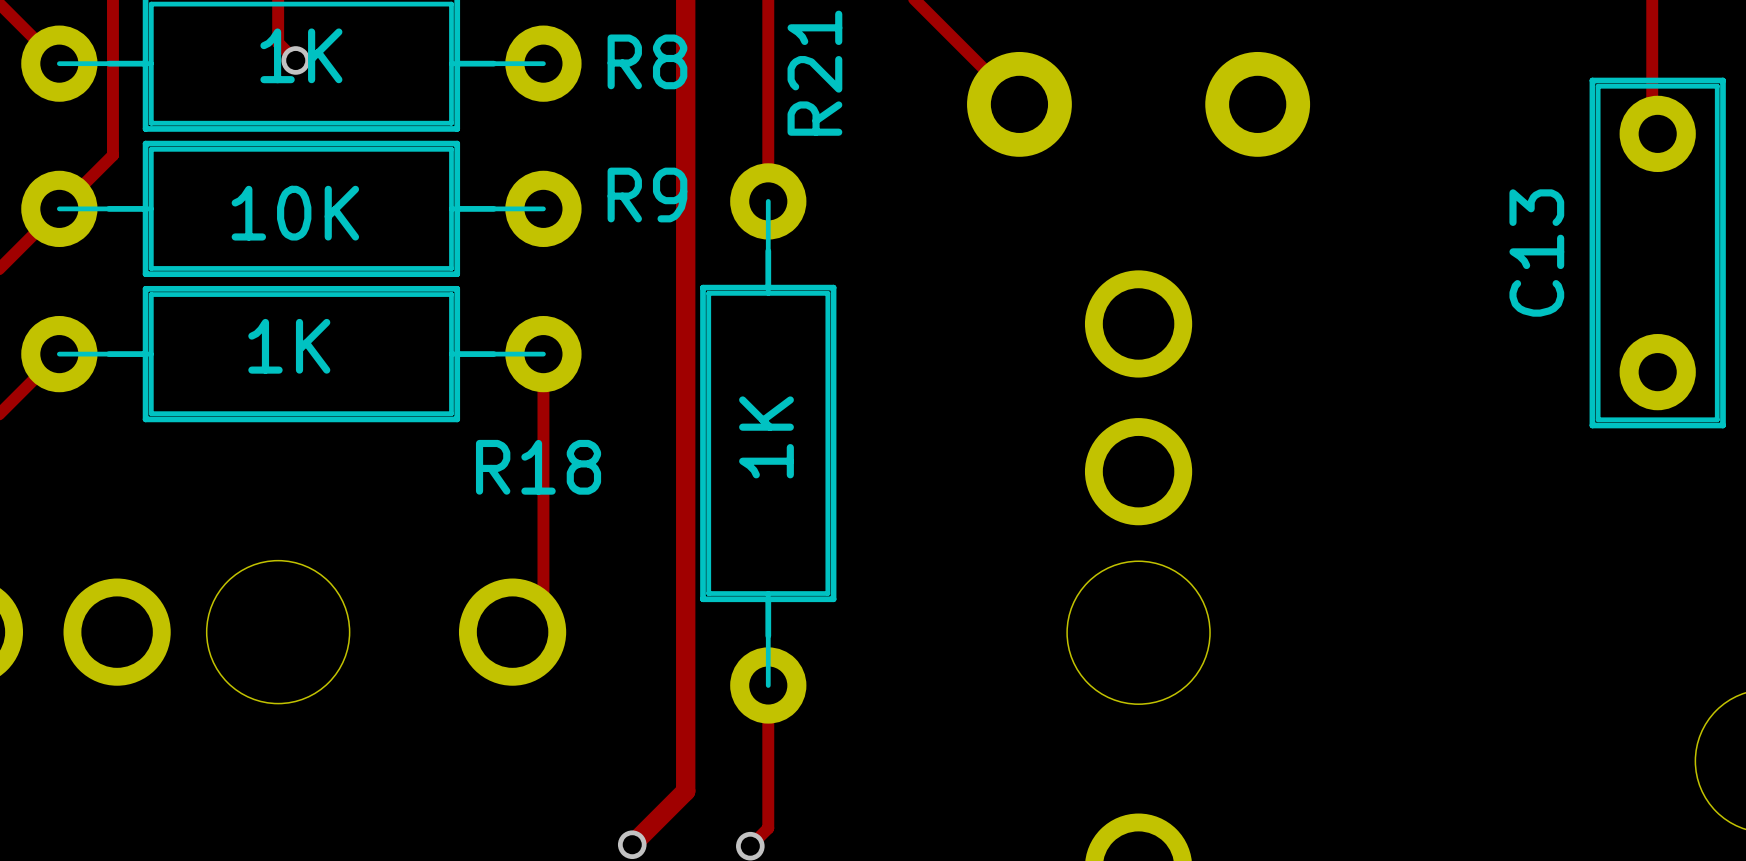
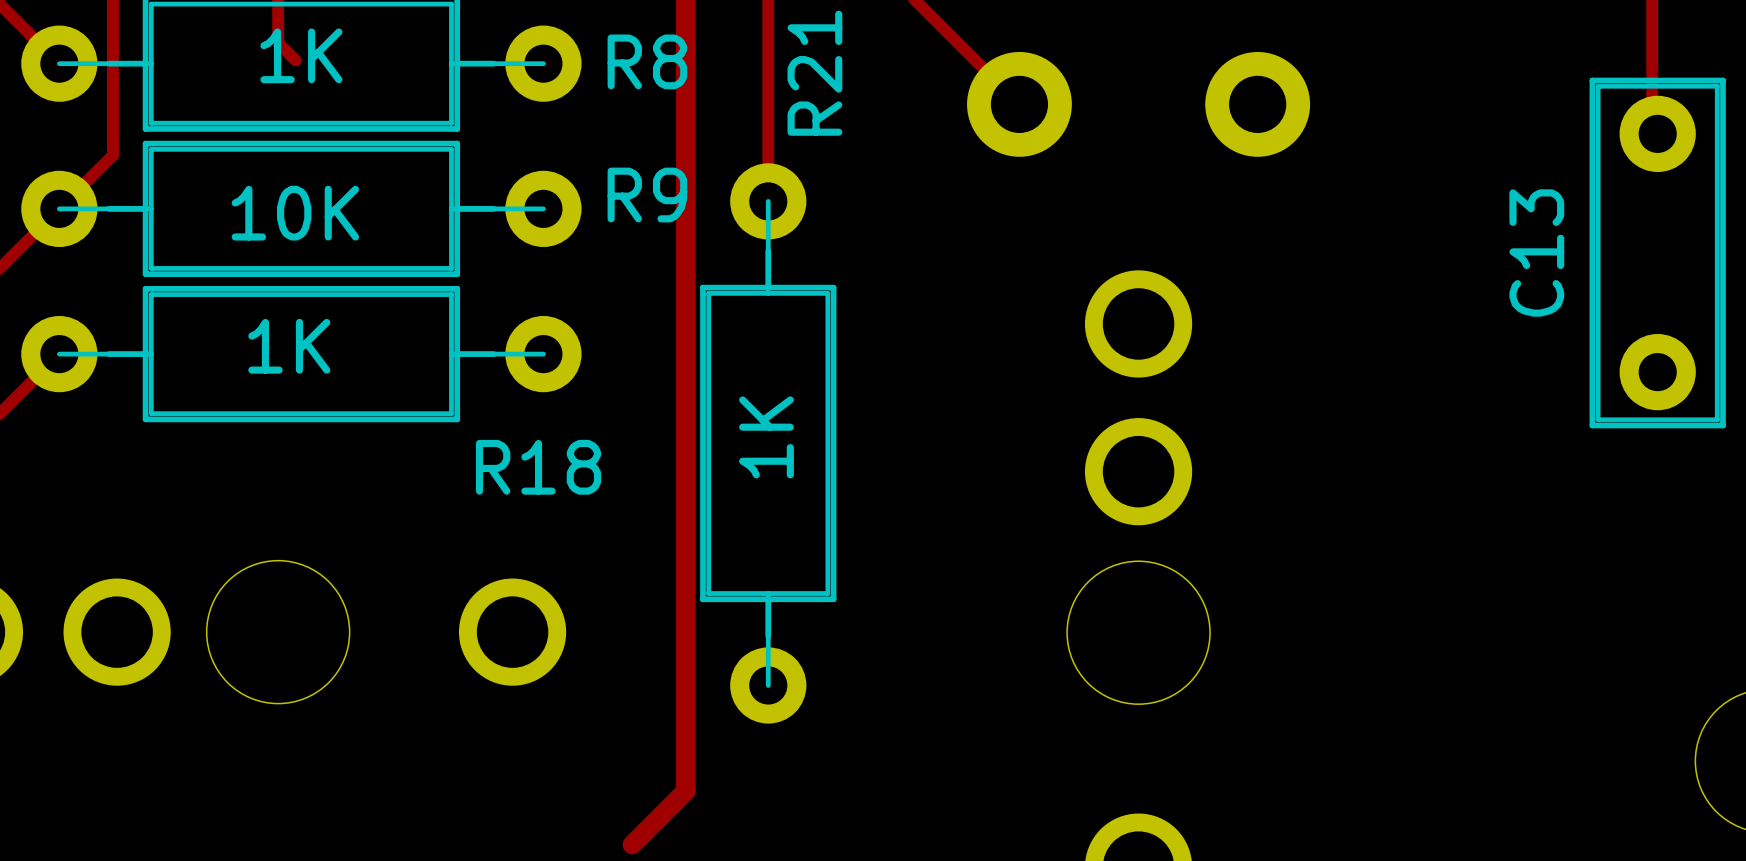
via: (295, 60) -> none
track: (543, 354) (543, 601) (512, 632) -> none
track: (768, 685) (768, 828) (750, 846) -> none
via: (632, 844) -> none
via: (750, 846) -> none

